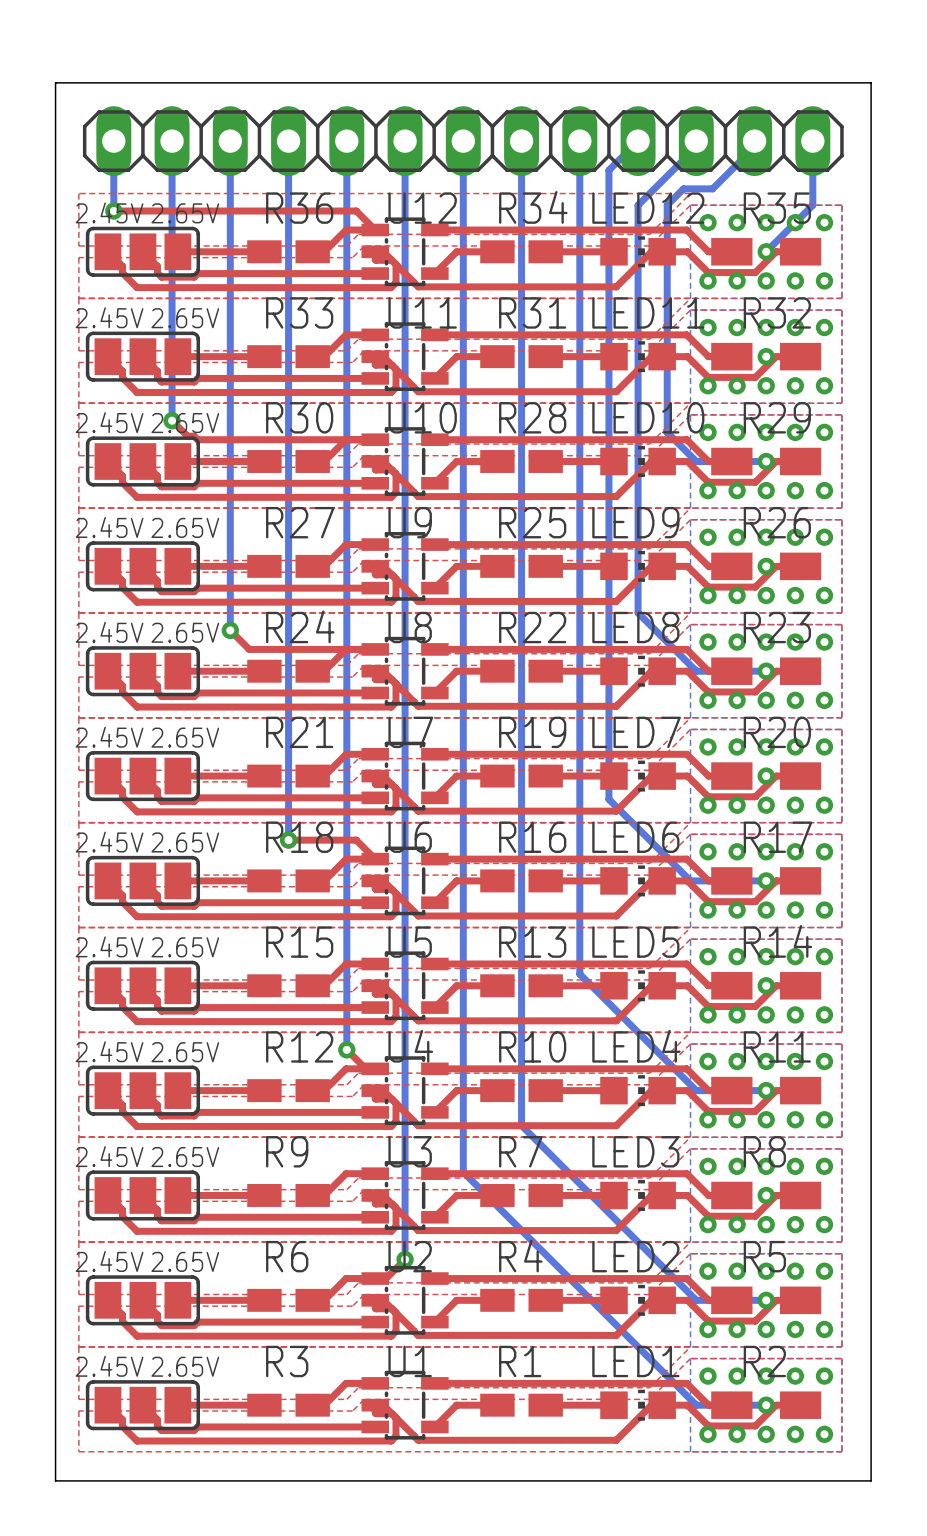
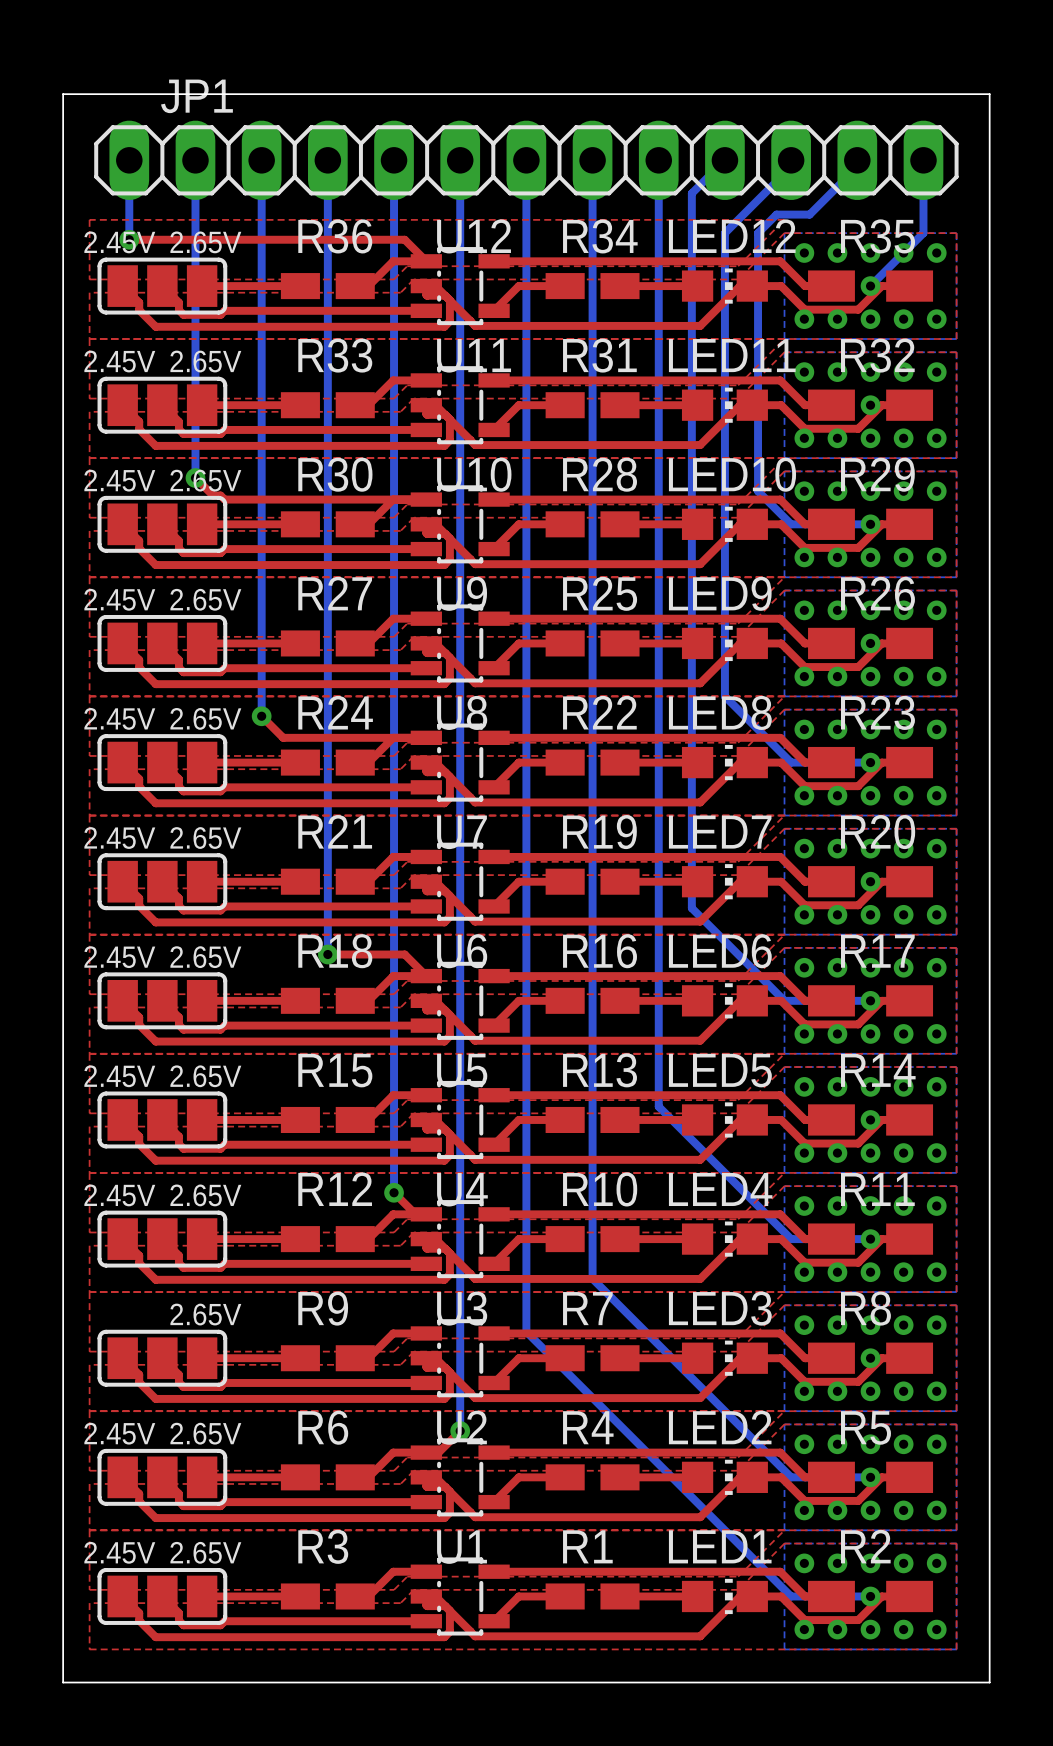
JP1 name: none -> JP1 (196, 96)
text: 2.45V (109, 1156) -> none

